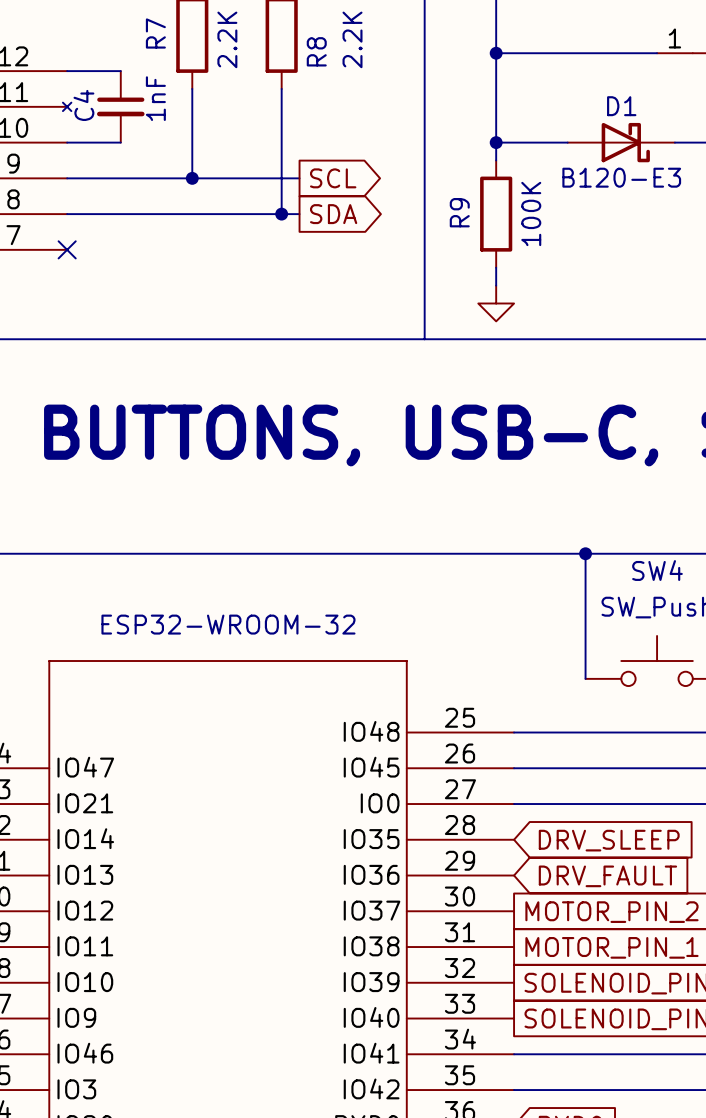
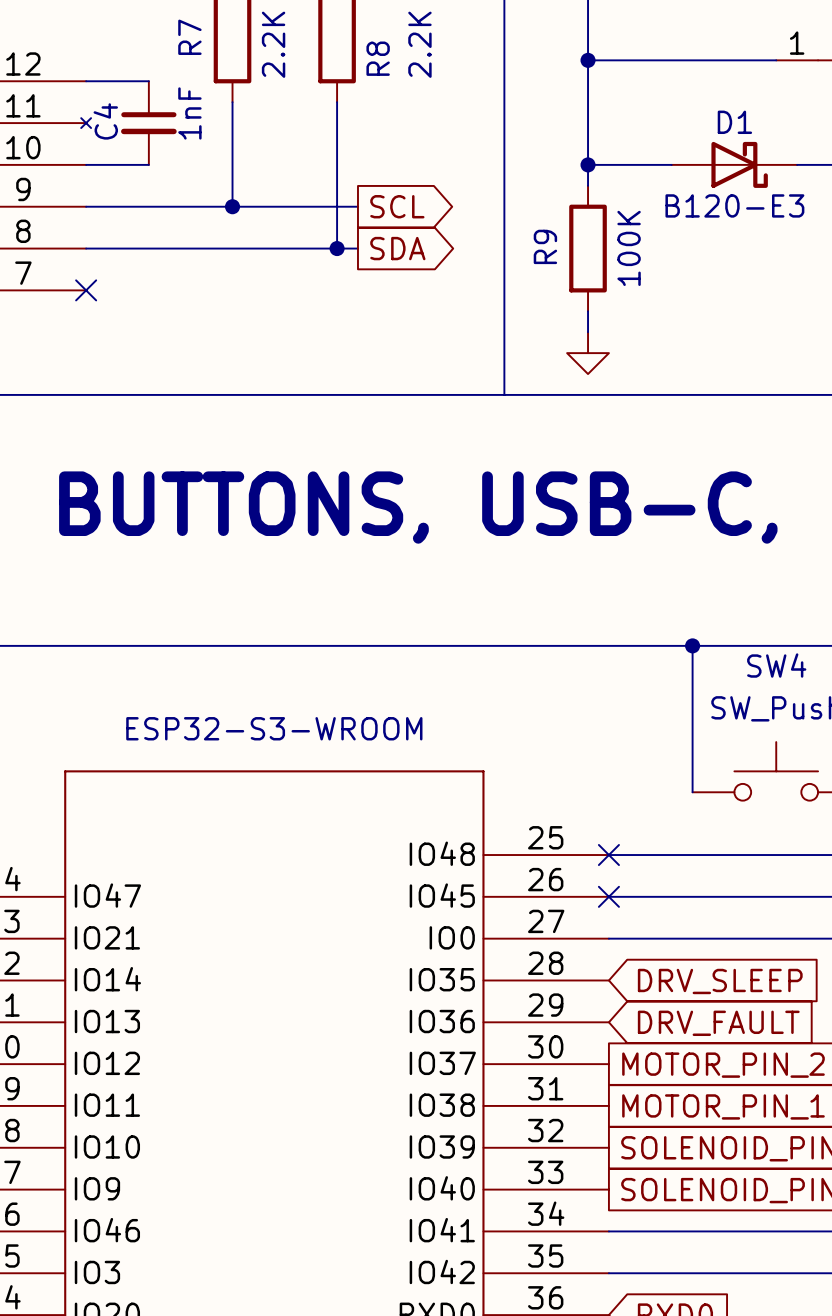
part value: ESP32-WROOM-32 (228, 624) -> ESP32-S3-WROOM (274, 728)
no-connect mark: none -> (608, 855)
no-connect mark: none -> (608, 896)

